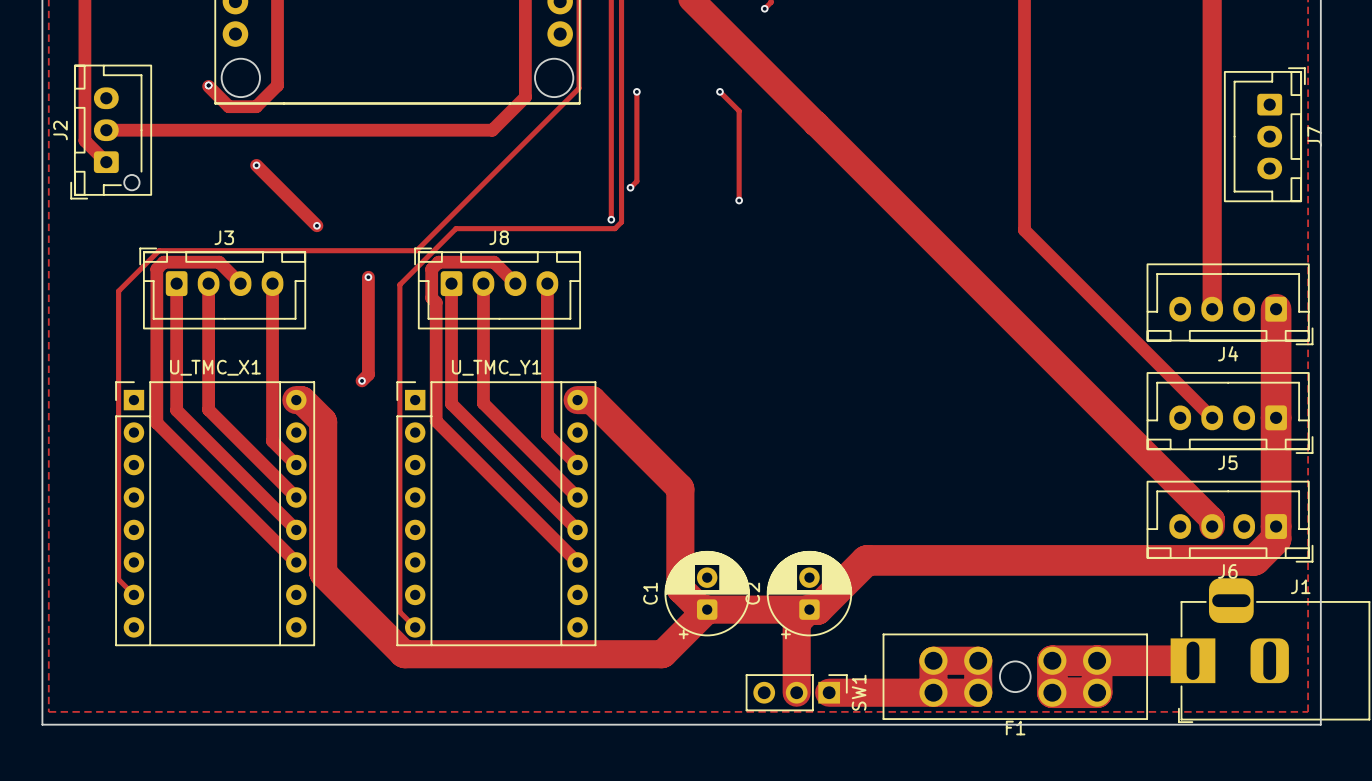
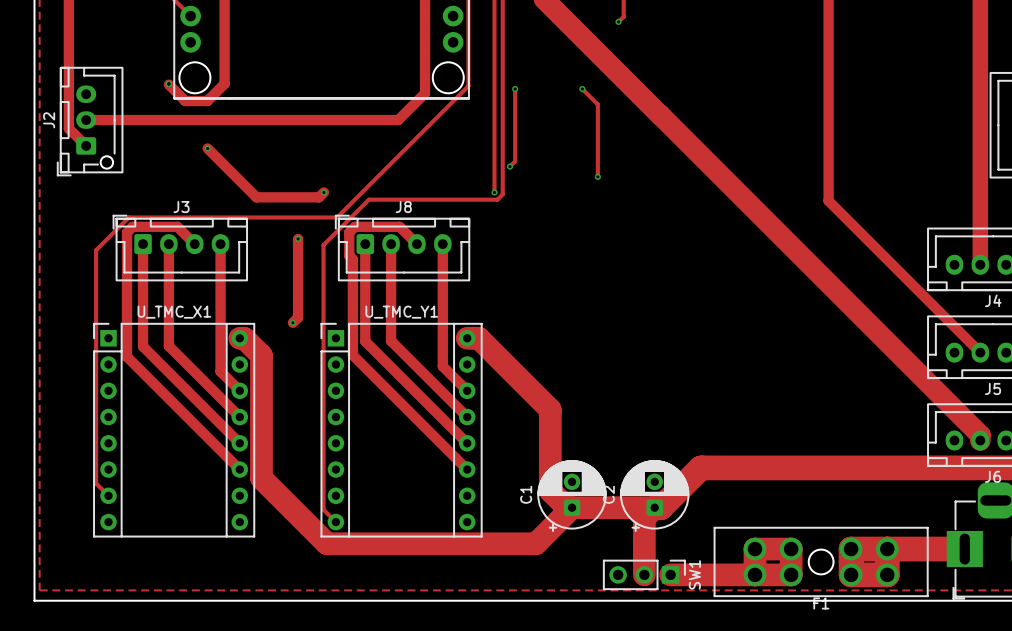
track: none -> (323, 192) (319, 197) (256, 197)
via: none -> (323, 192)
via: (316, 225) -> none

